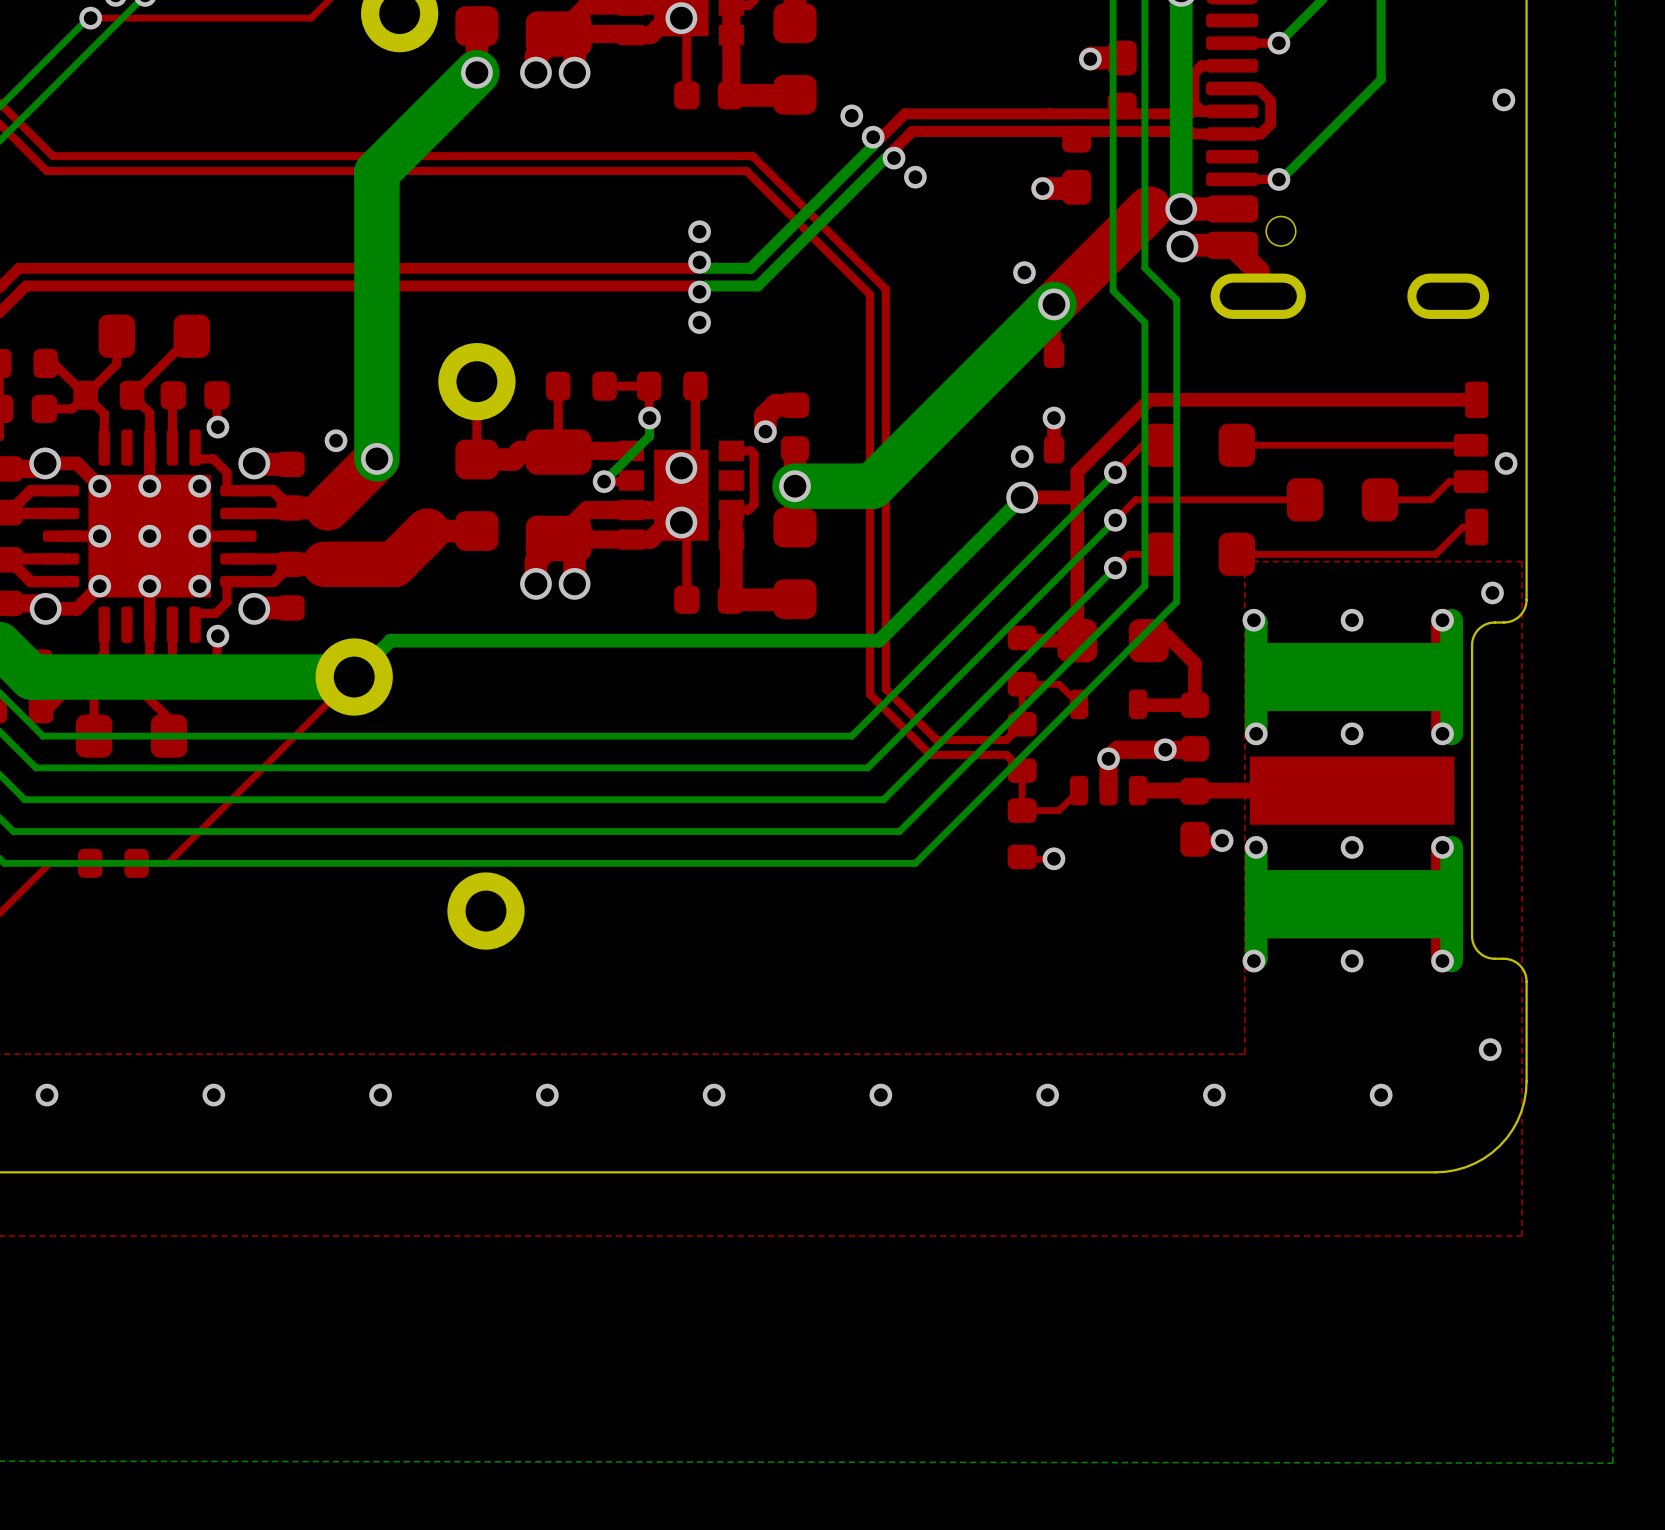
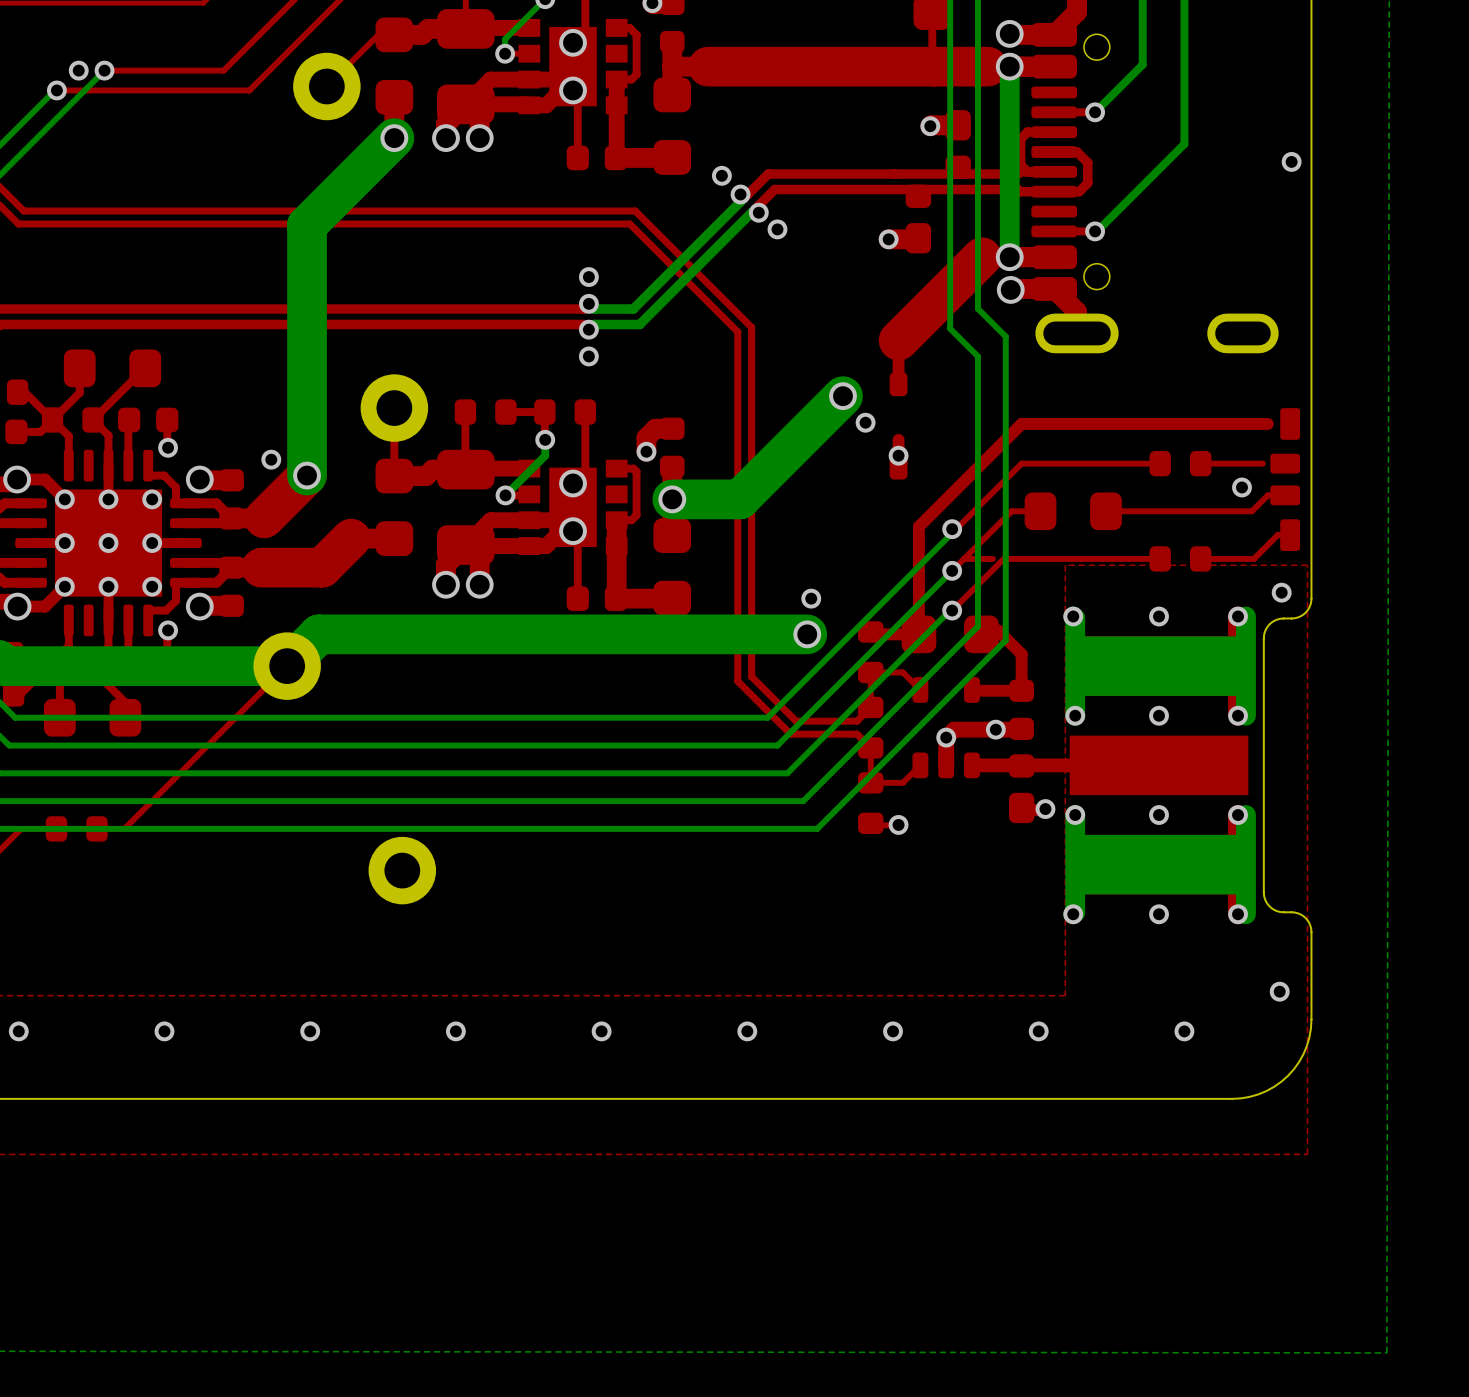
via: (1024, 272) -> none
bottom track: (1054, 304) (990, 368) -> none
via: (1054, 304) -> none
via: none -> (842, 396)
via: none -> (865, 422)
top track: (1194, 399) (1149, 399) (1077, 471) (1077, 517) -> (1021, 423) (918, 526)
via position: (1054, 418) -> (898, 455)
top track: (1161, 445) (1142, 445) (1115, 472) -> none
part: (1199, 445) -> none
top track: none -> (1058, 463) (1021, 463) (952, 533)
part: none -> (1180, 463)
top track: (1399, 445) (1353, 445) -> none
via: (1022, 456) -> none
part position: (1470, 463) -> (1285, 479)
via position: (1506, 463) -> (1241, 487)
bottom track: (1115, 472) (851, 736) -> (952, 533) (767, 717) (721, 717)
via: (1115, 472) -> none
top track: (1470, 481) (1449, 481) (1431, 499) -> (1285, 495) (1267, 495) (1251, 511) (1228, 511)
bottom track: (1022, 497) (879, 640) -> (807, 634) (745, 634)
via: (1022, 497) -> none
top track: (1077, 497) (1022, 497) -> none
top track: (1183, 499) (1135, 499) (1115, 520) -> (1011, 511) (964, 558)
part: none -> (1073, 511)
top track: (1291, 499) (1216, 499) -> (1183, 511) (1117, 511)
part: (1342, 499) -> none
bottom track: (1115, 520) (867, 767) -> none
top track: (1476, 527) (1462, 527) (1435, 554) -> (1290, 535) (1277, 535) (1253, 558) (1232, 558)
part: (1199, 554) -> none
top track: none -> (1058, 558) (1003, 558) (952, 610)
part: none -> (1180, 558)
top track: (1399, 554) (1353, 554) -> none
bottom track: (1144, 586) (899, 831) -> (977, 586) (977, 626) (803, 801) (763, 801)
via: none -> (811, 598)
bottom track: (1176, 602) (915, 863) -> (1005, 600) (1005, 640) (817, 828) (777, 828)
bottom track: none -> (952, 610) (787, 773) (749, 773)
via: none -> (952, 610)
bottom track width: thin (879, 640) (390, 640) (354, 677) -> thick (745, 634) (318, 634) (287, 666)
via: none -> (807, 634)
bottom track: (915, 767) (883, 799) -> (777, 745) (735, 745)

